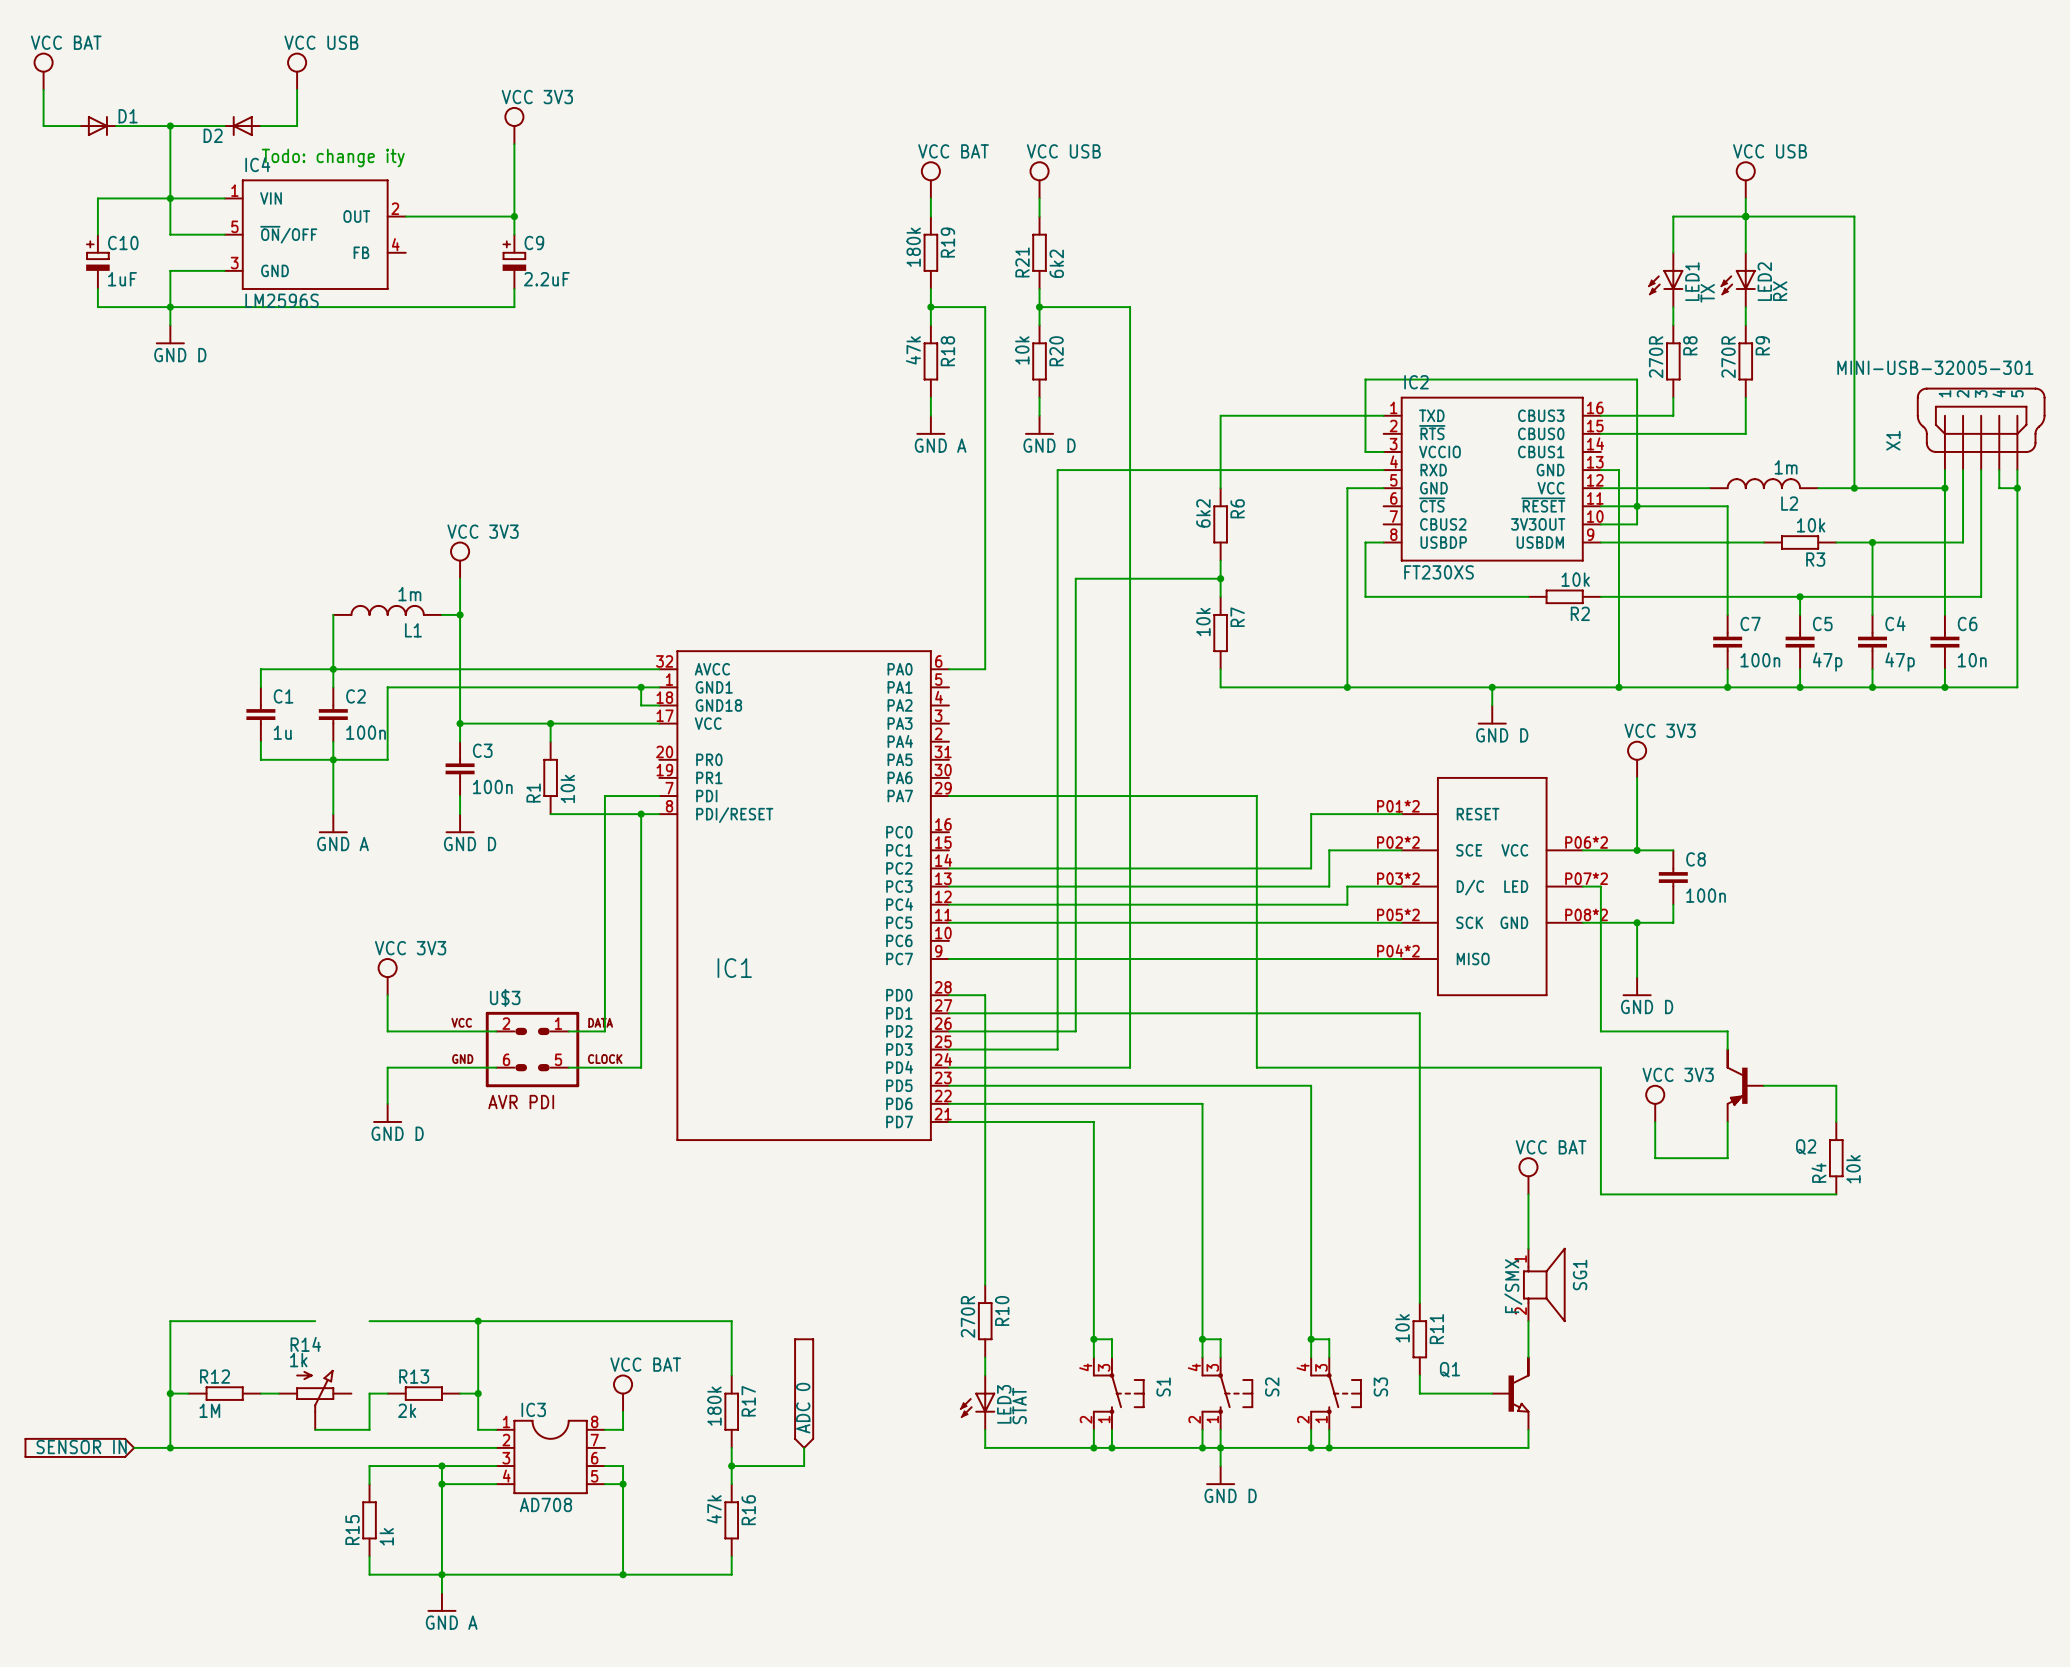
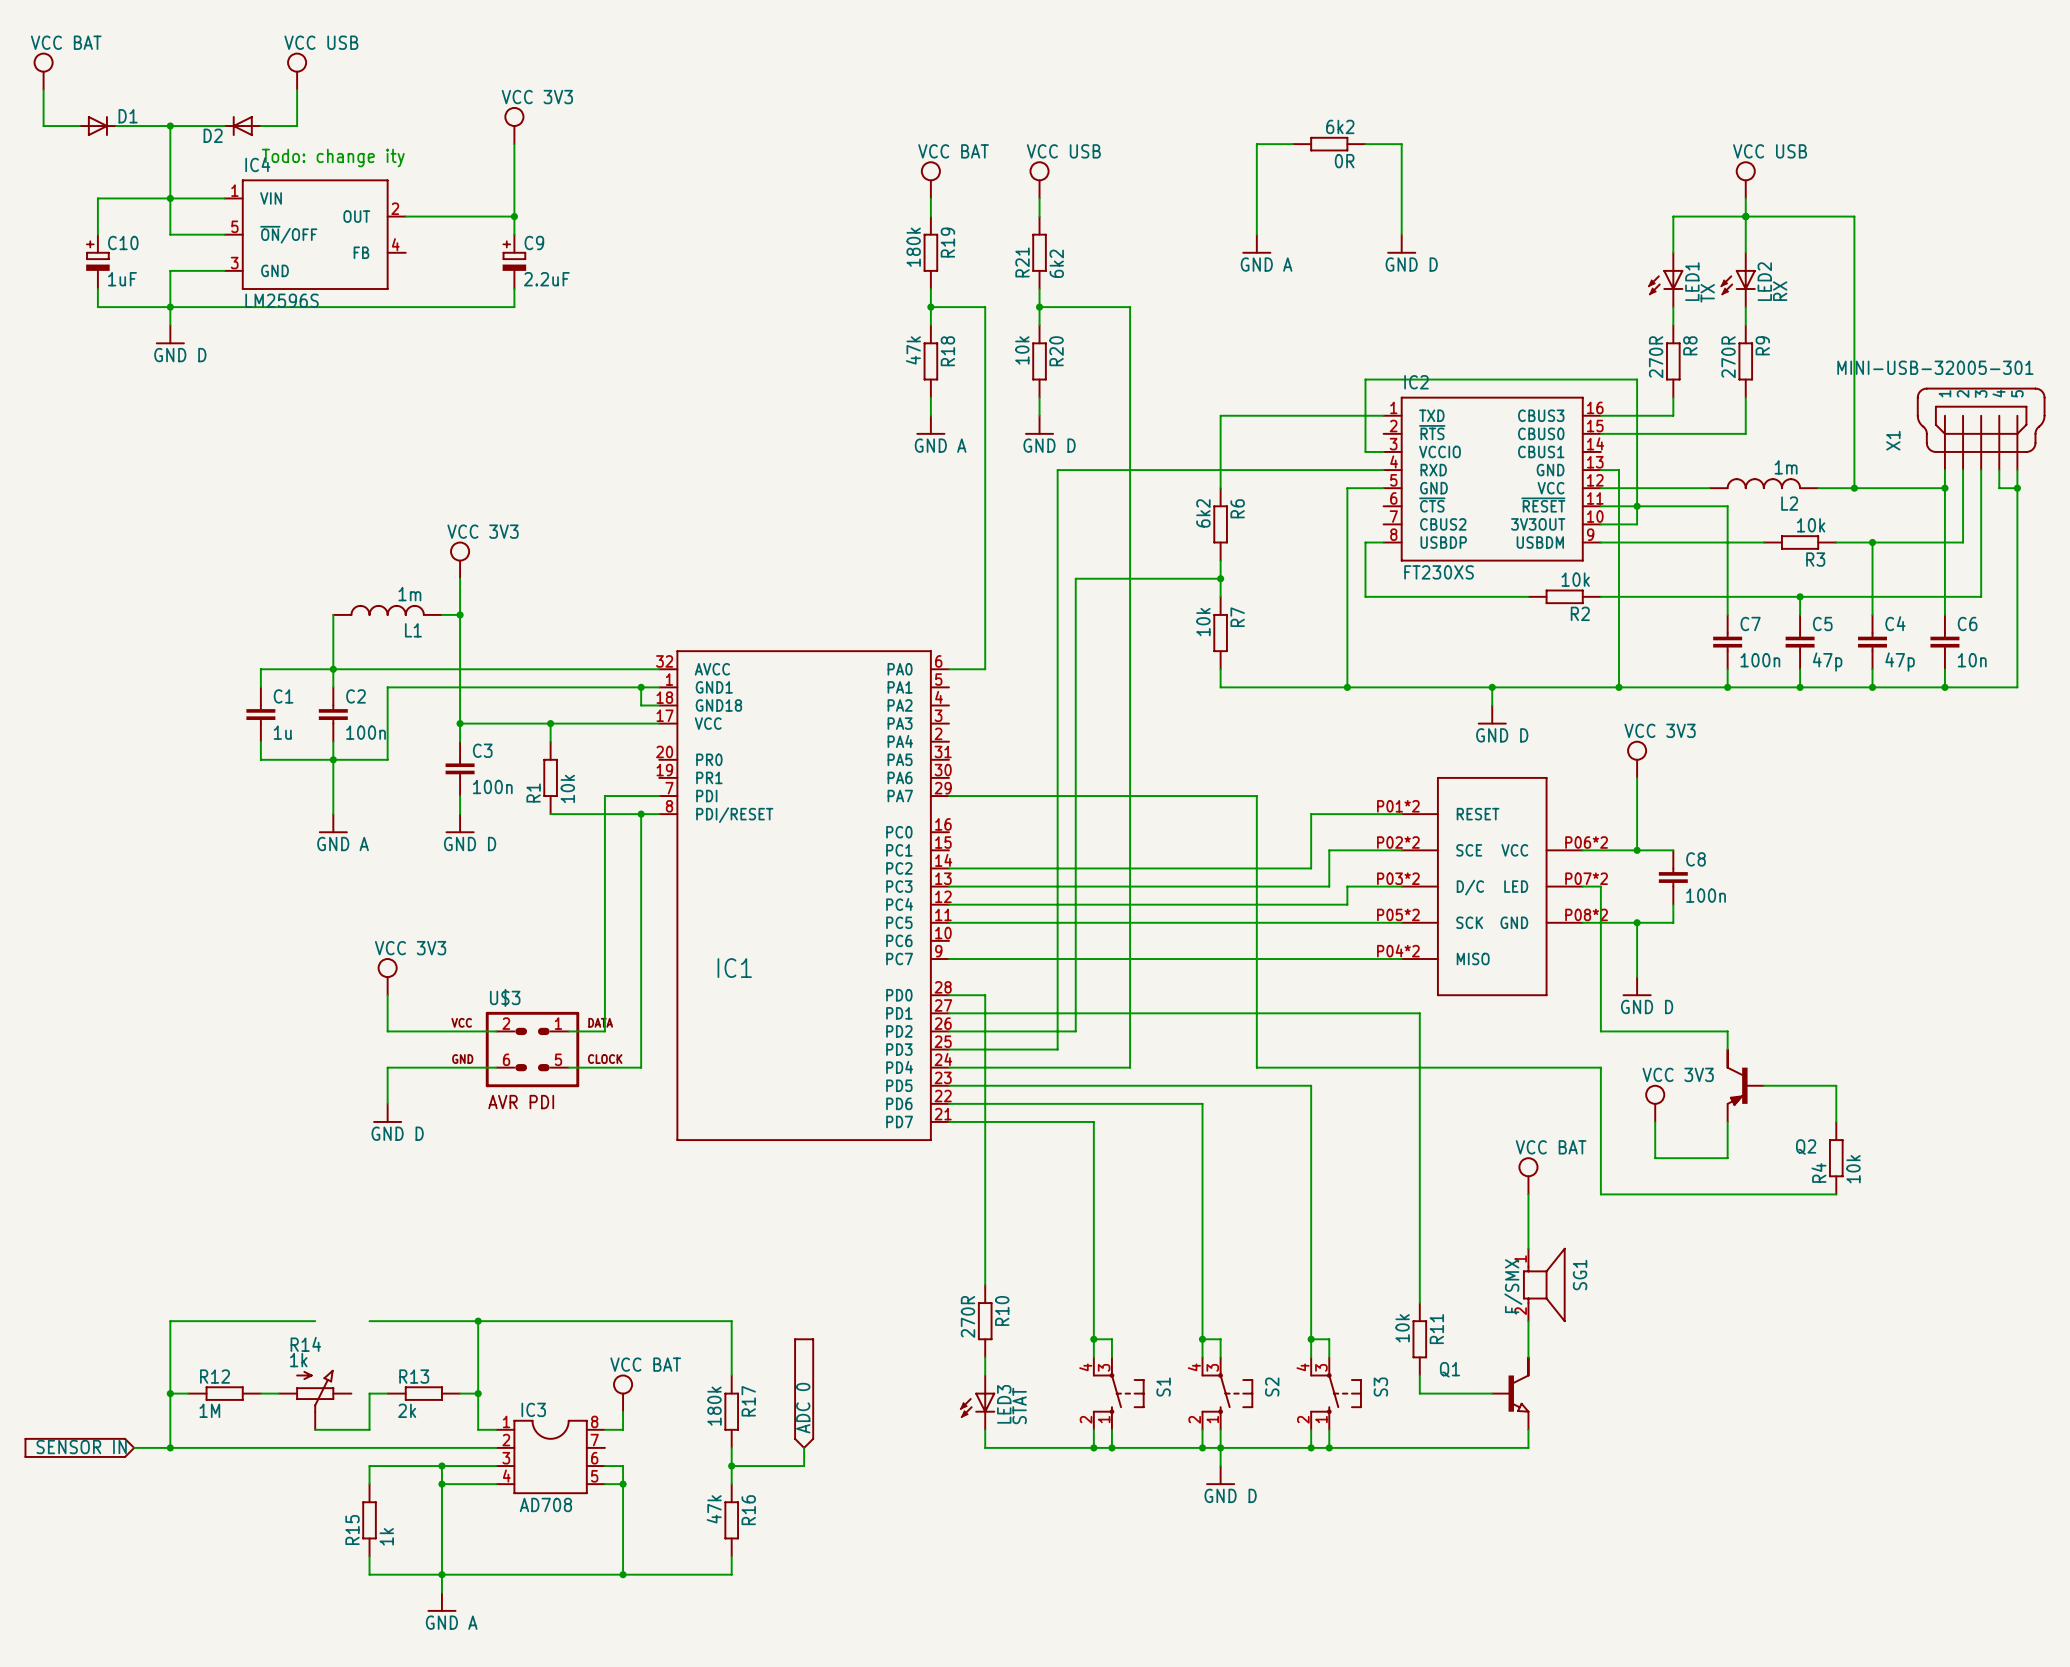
wire: none -> (1293, 144) (1256, 144) (1256, 234)
0R: none -> 6k2 (1329, 144)
wire: none -> (1365, 144) (1401, 144) (1401, 234)
power symbol: none -> GND A (1256, 244)
power symbol: none -> GND D (1401, 244)

